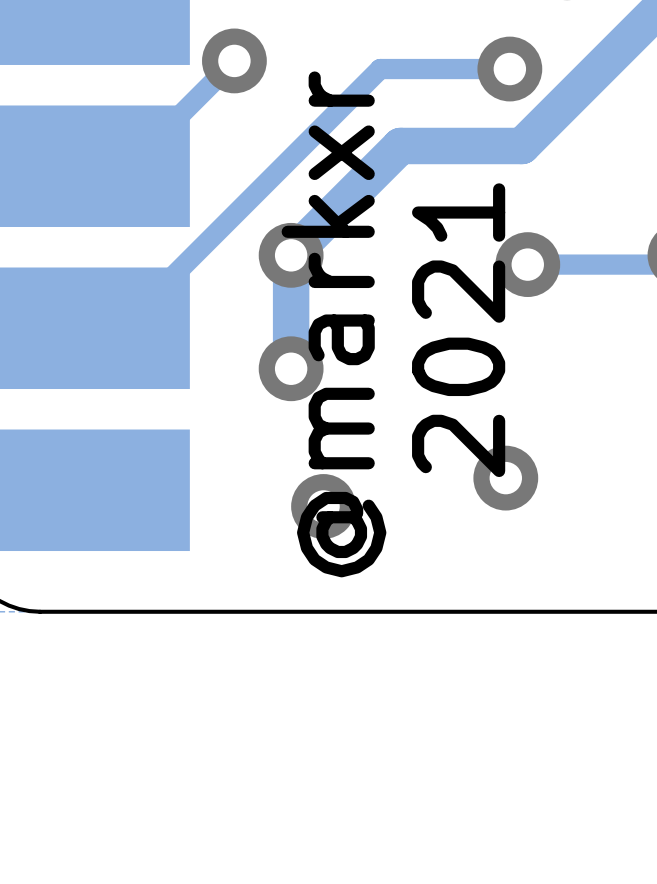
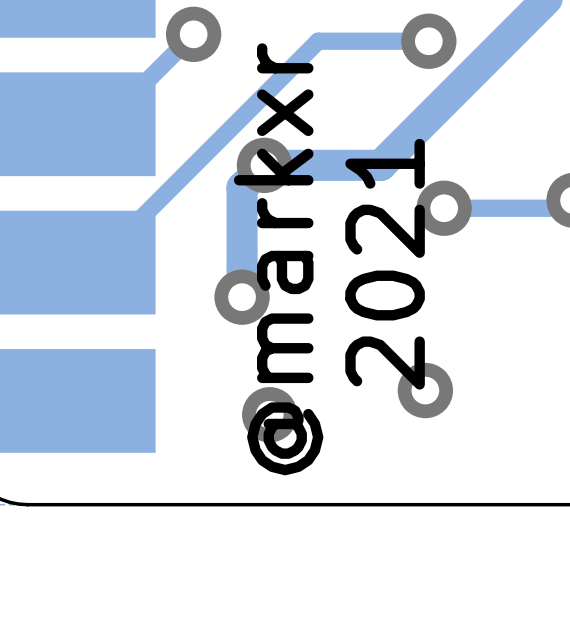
track: (522, 145) (400, 145) (291, 255) -> (439, 106) (380, 165) (264, 165) (242, 187) (242, 200)
via position: (291, 255) -> (264, 165)

